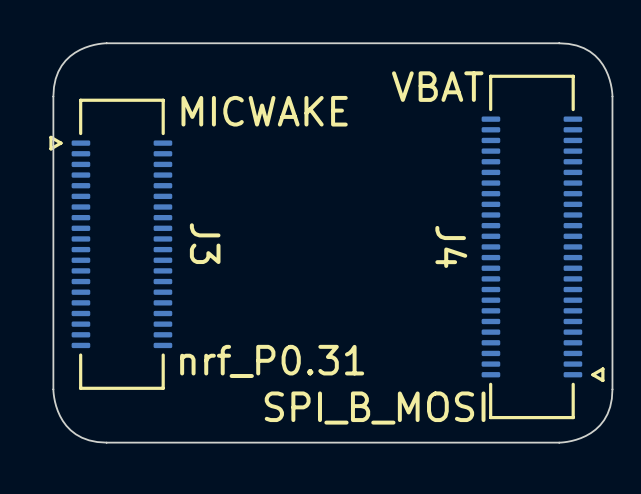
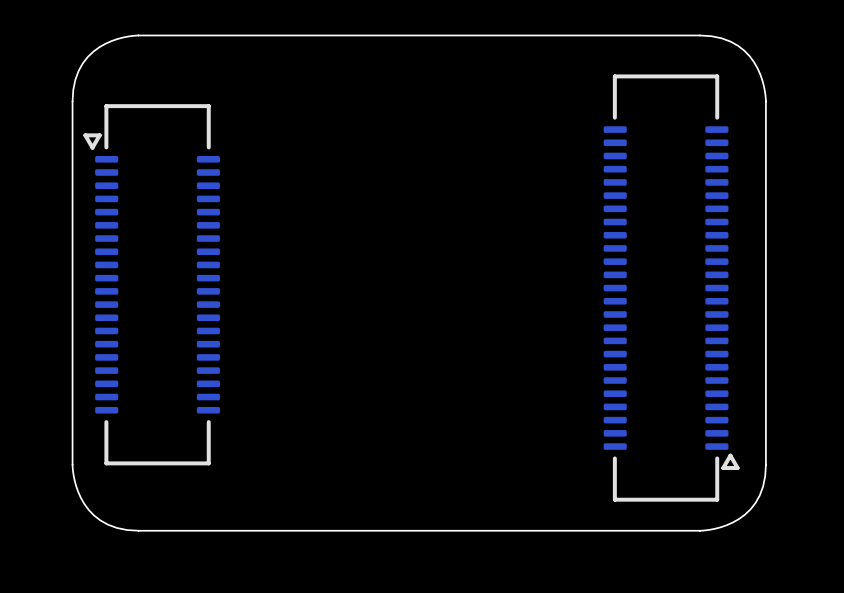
text: VBAT (437, 86) -> none
text: MICWAKE (264, 111) -> none
J3: (110, 244) -> none
part: none -> (151, 284)
part: none -> (671, 288)
J4: (543, 246) -> none
text: nrf_P0.31 (272, 361) -> none
text: SPI_B_MOSI (375, 408) -> none

